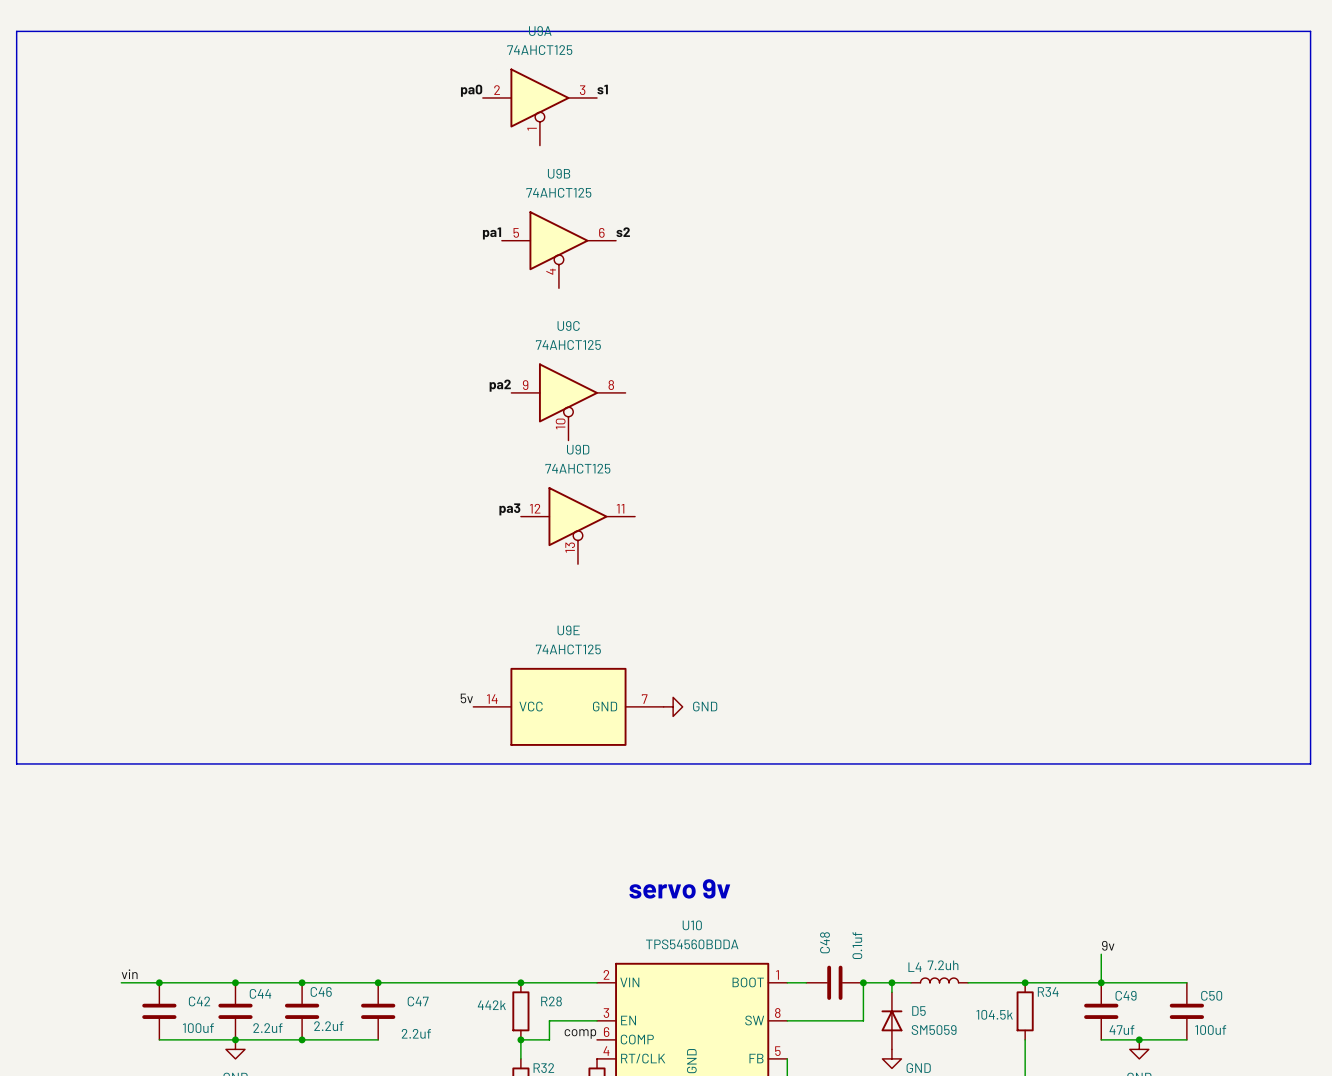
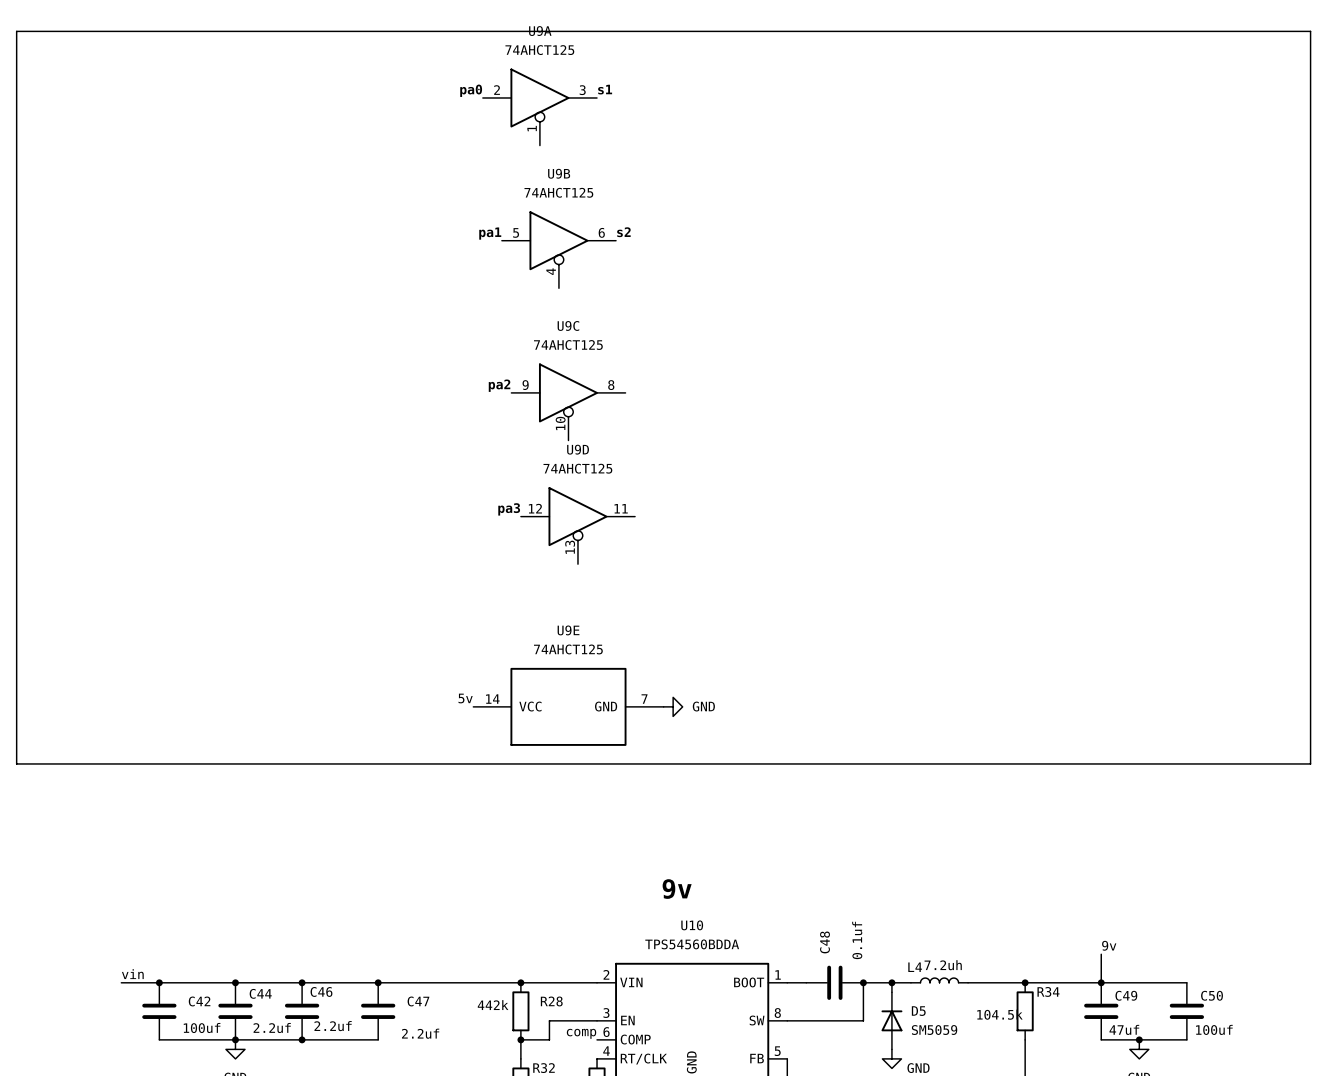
text: servo 9v (679, 888) -> 9v (677, 889)

